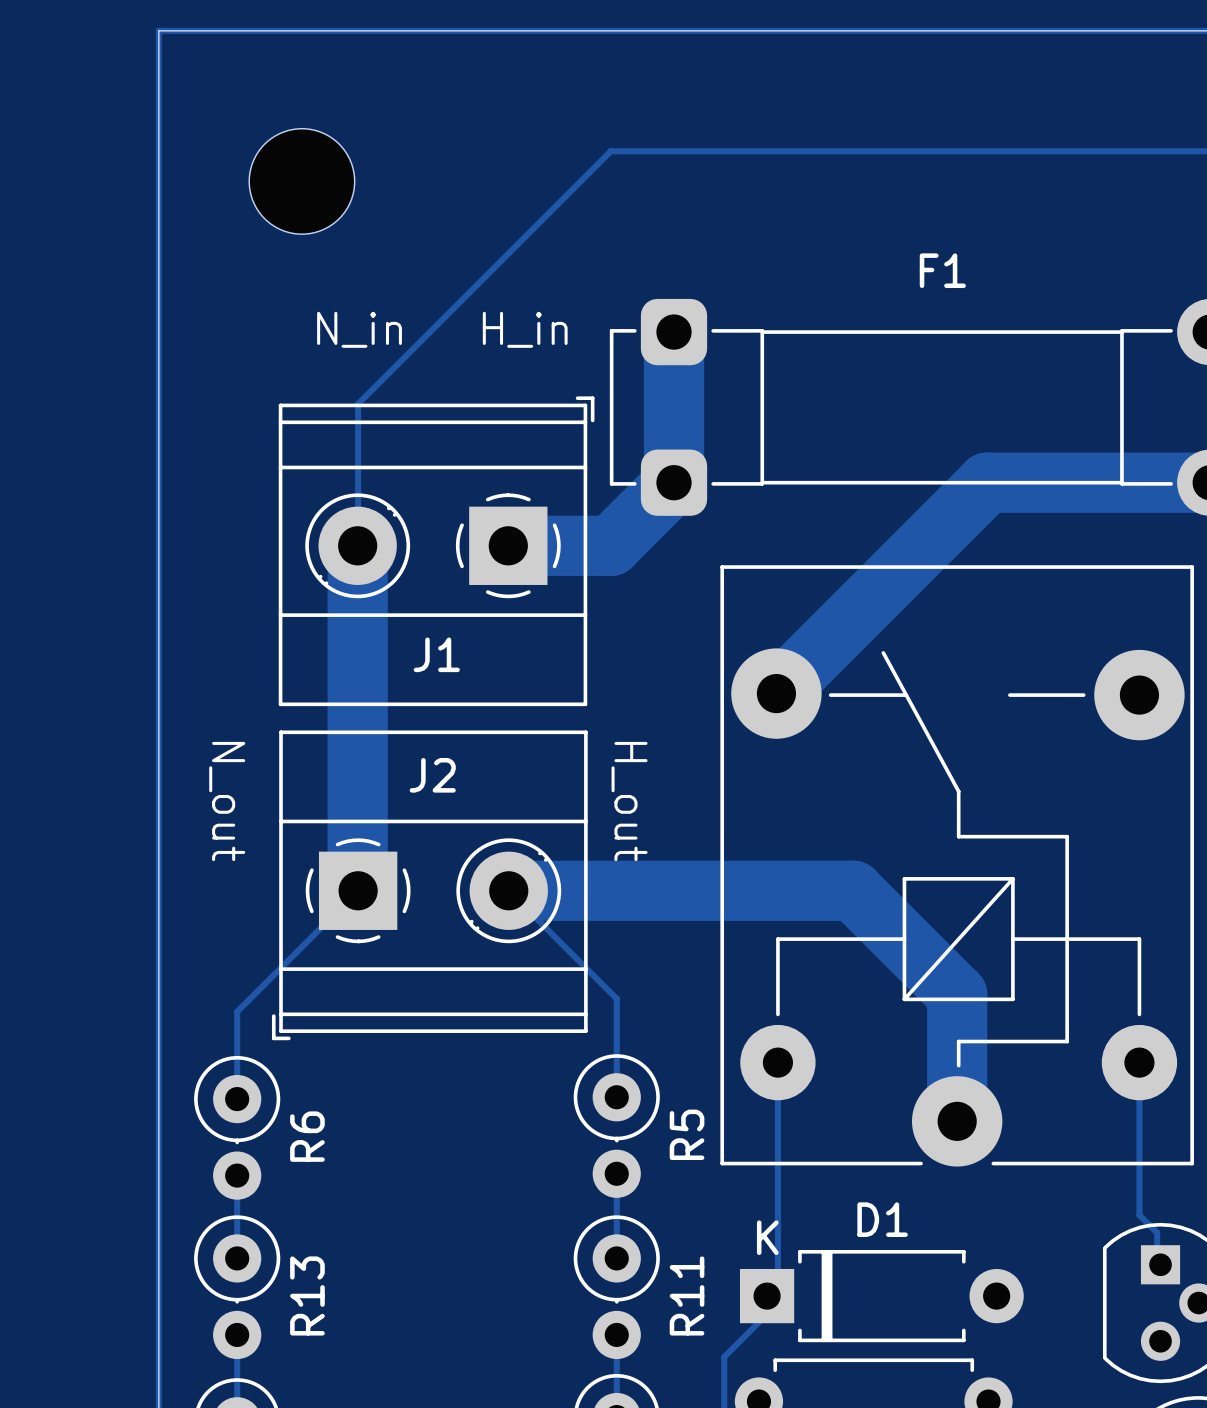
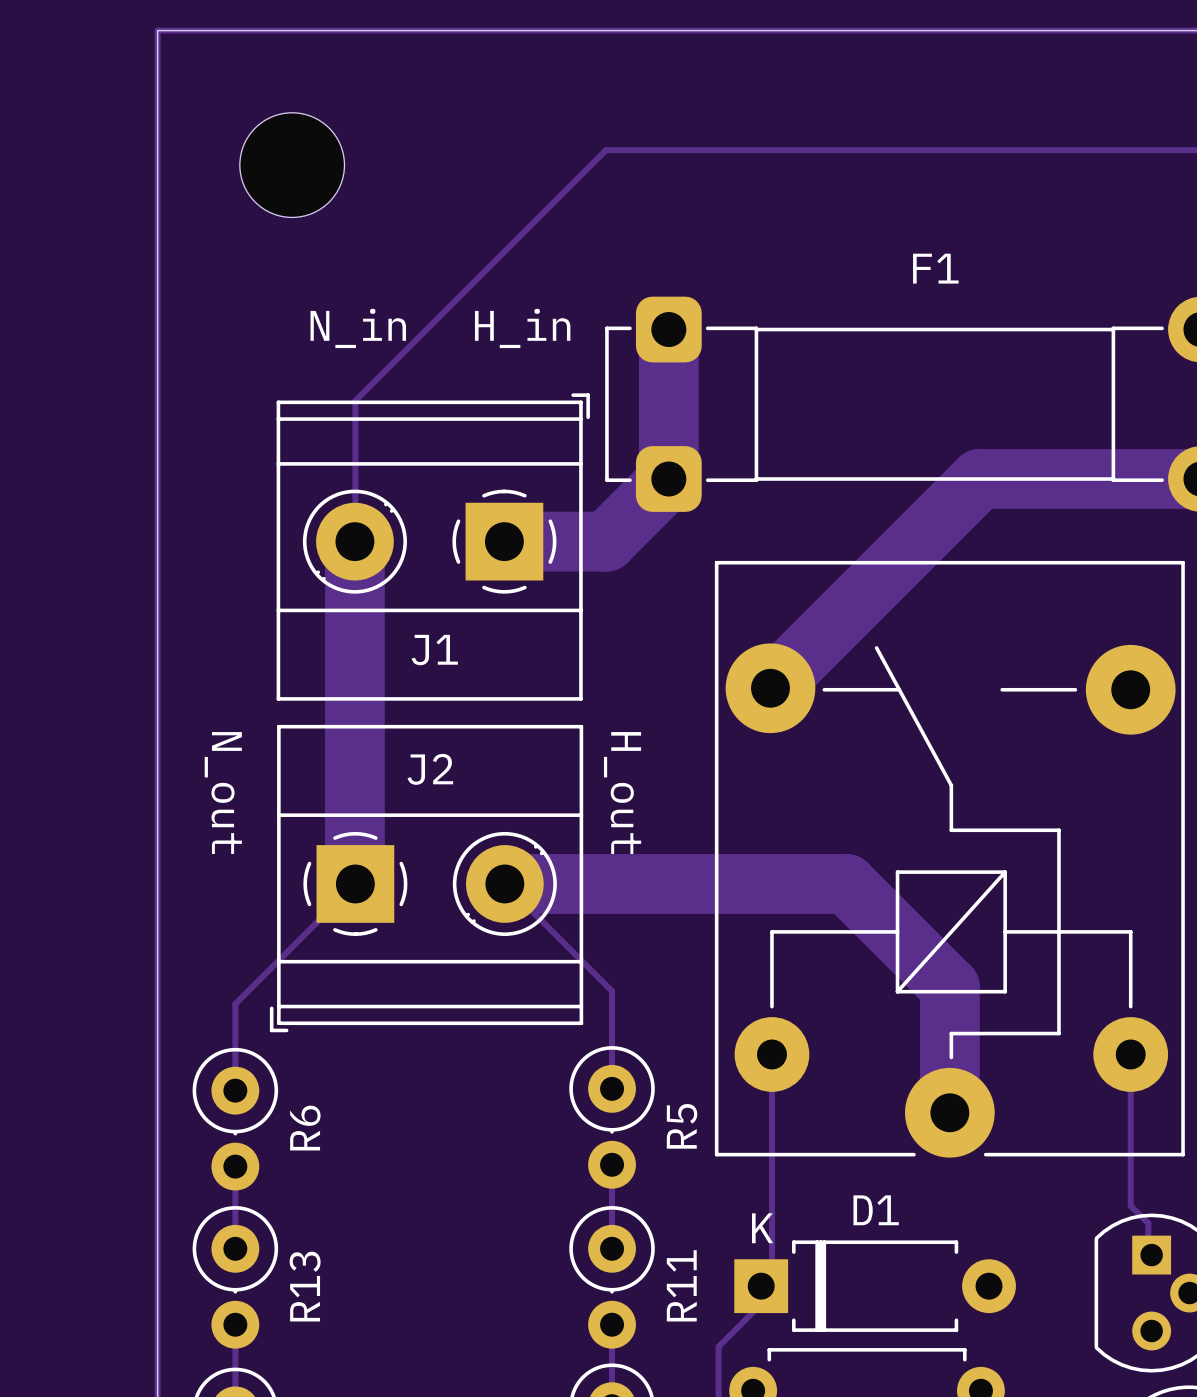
part position: (301, 181) -> (292, 165)

